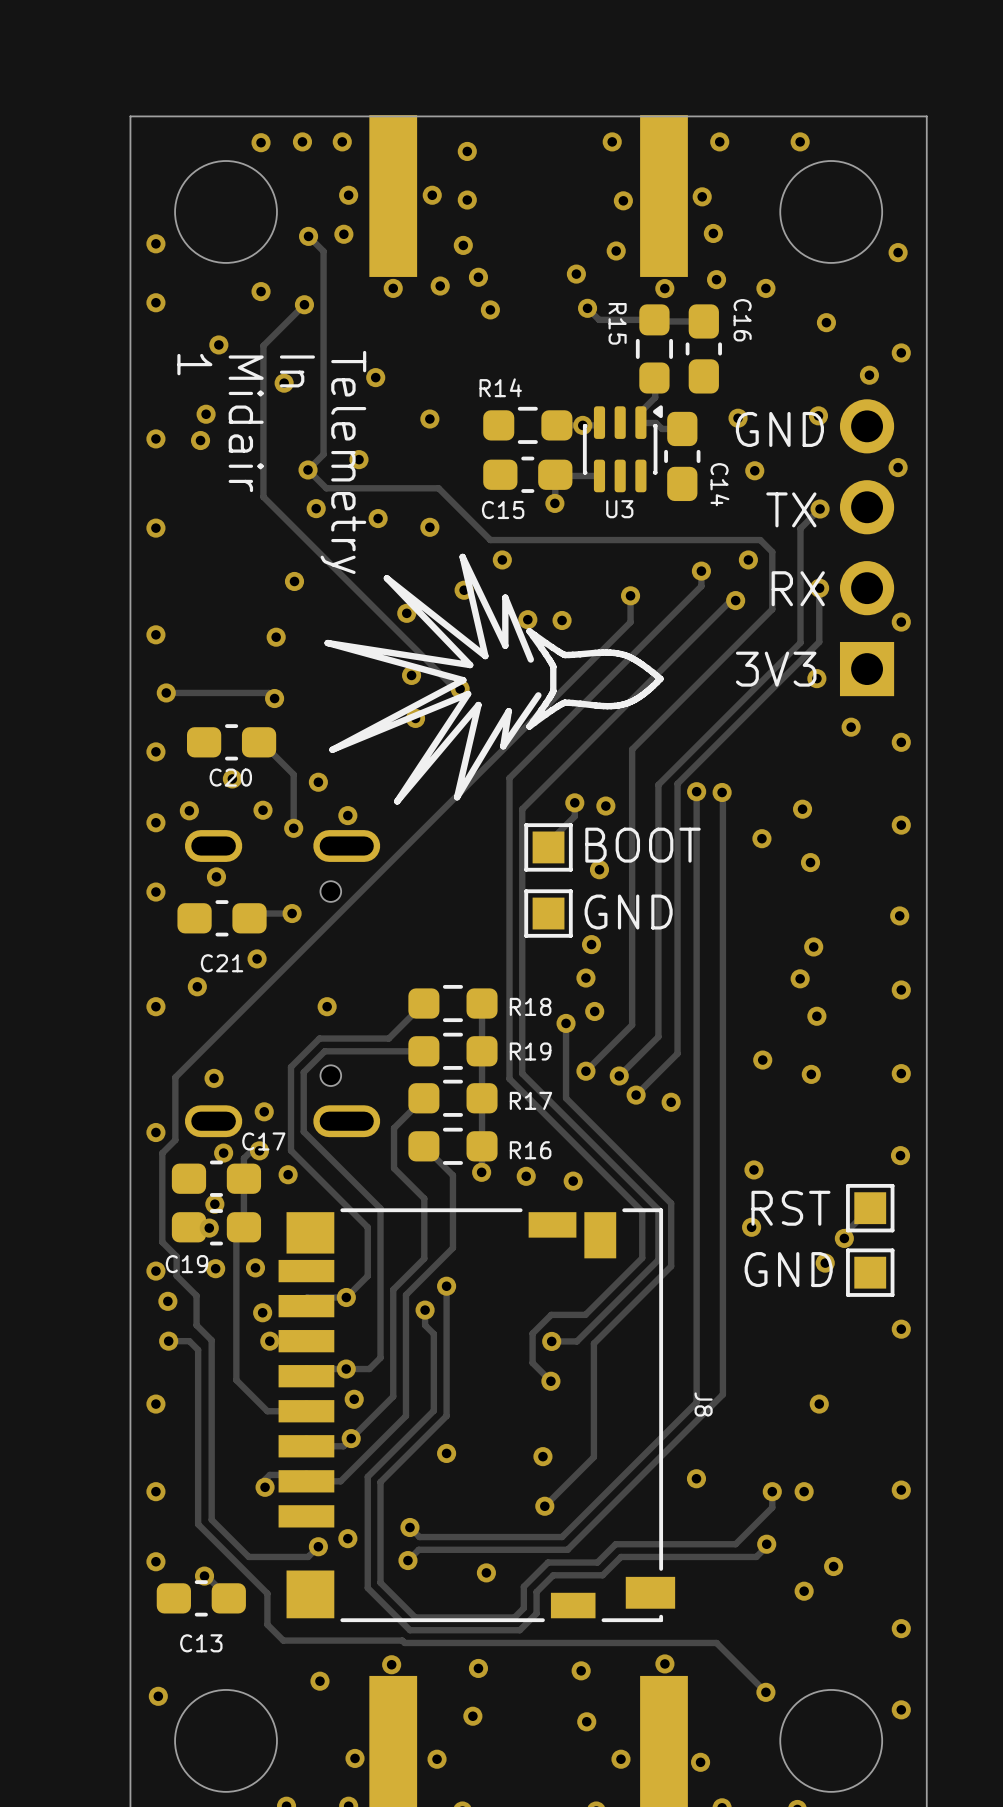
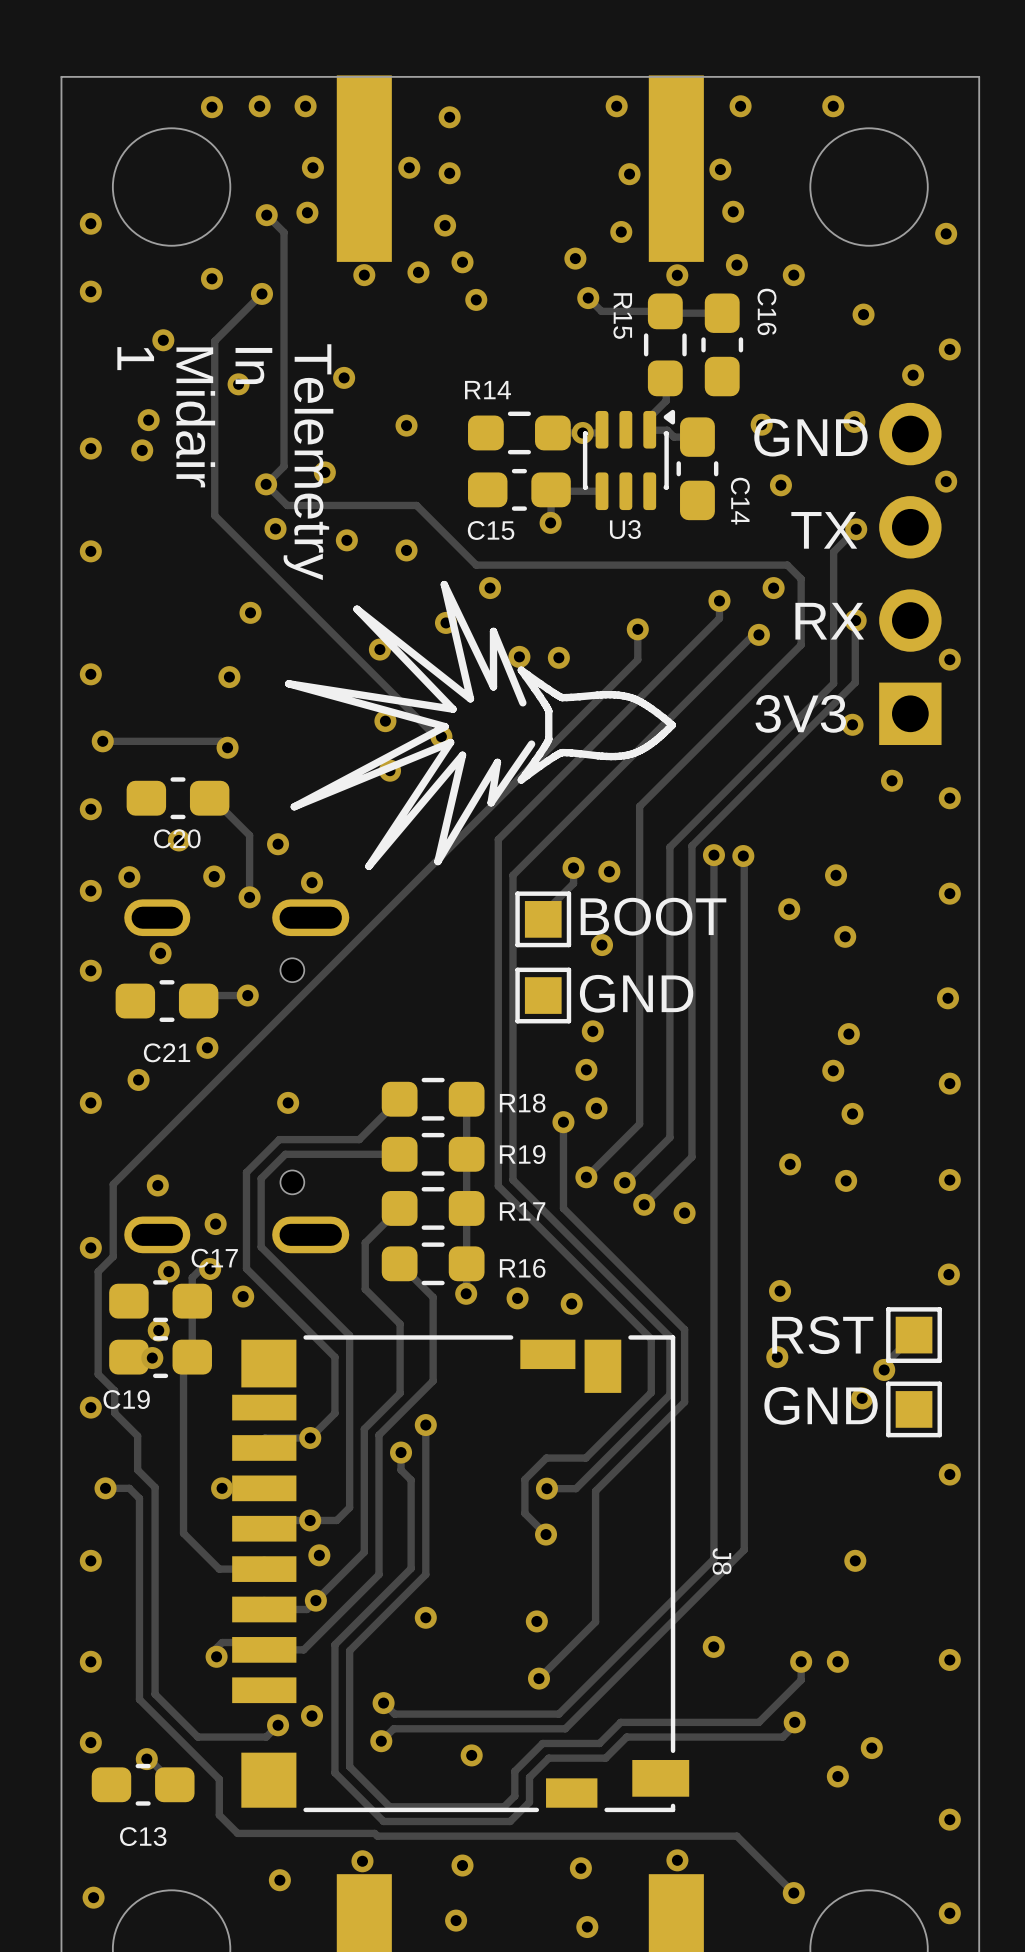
via: (255, 1267) -> none
via: (215, 1268) -> none
via: (167, 1301) -> none
via: (262, 1312) -> none

